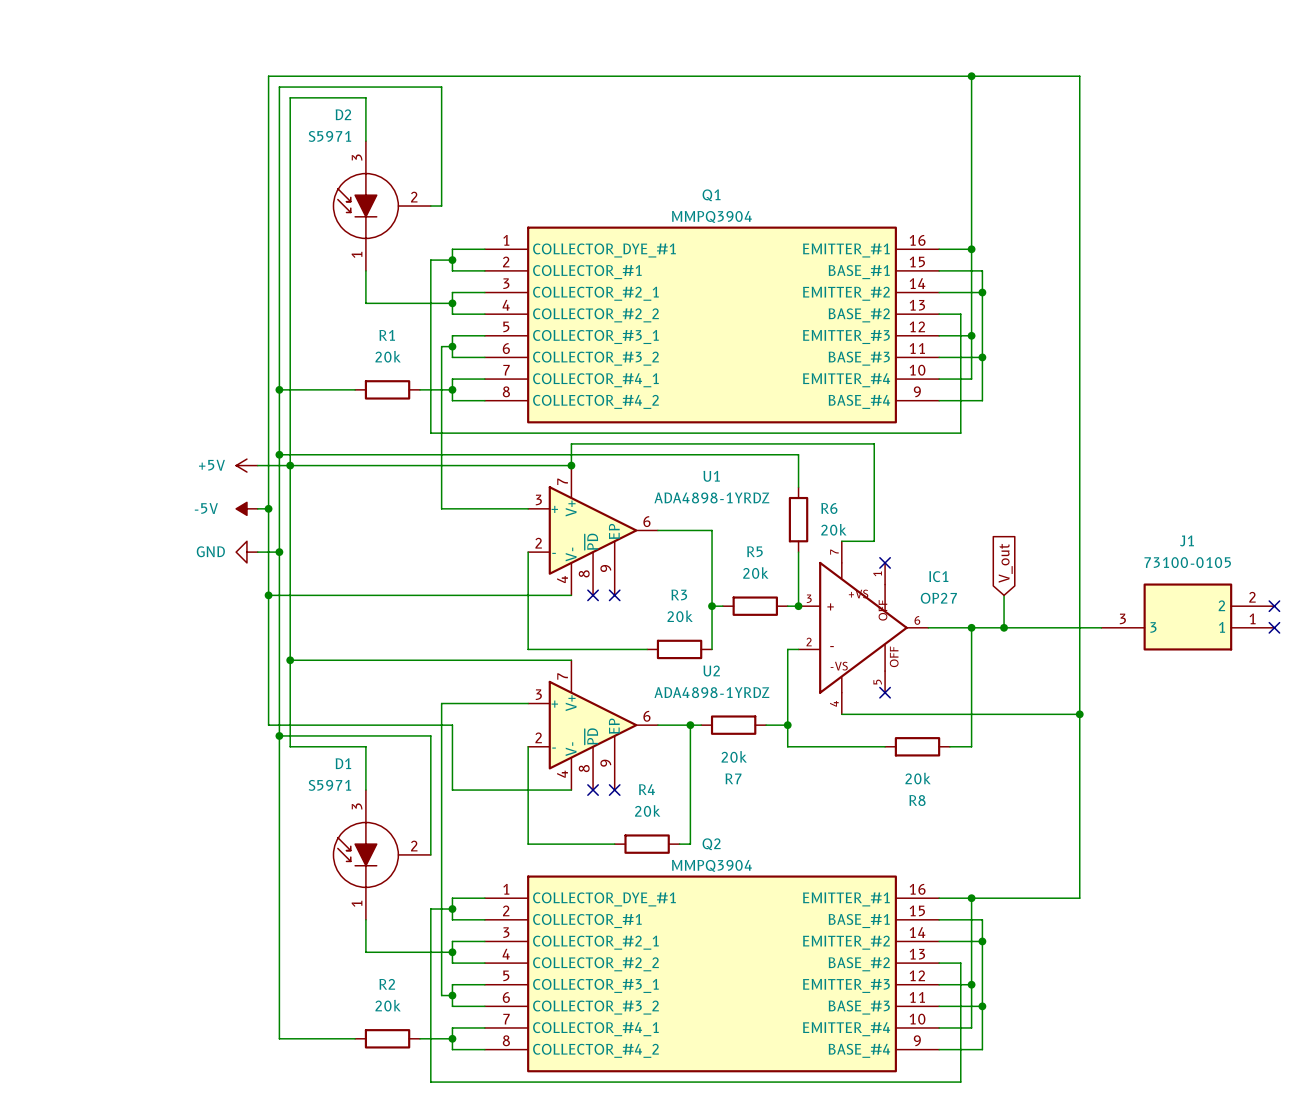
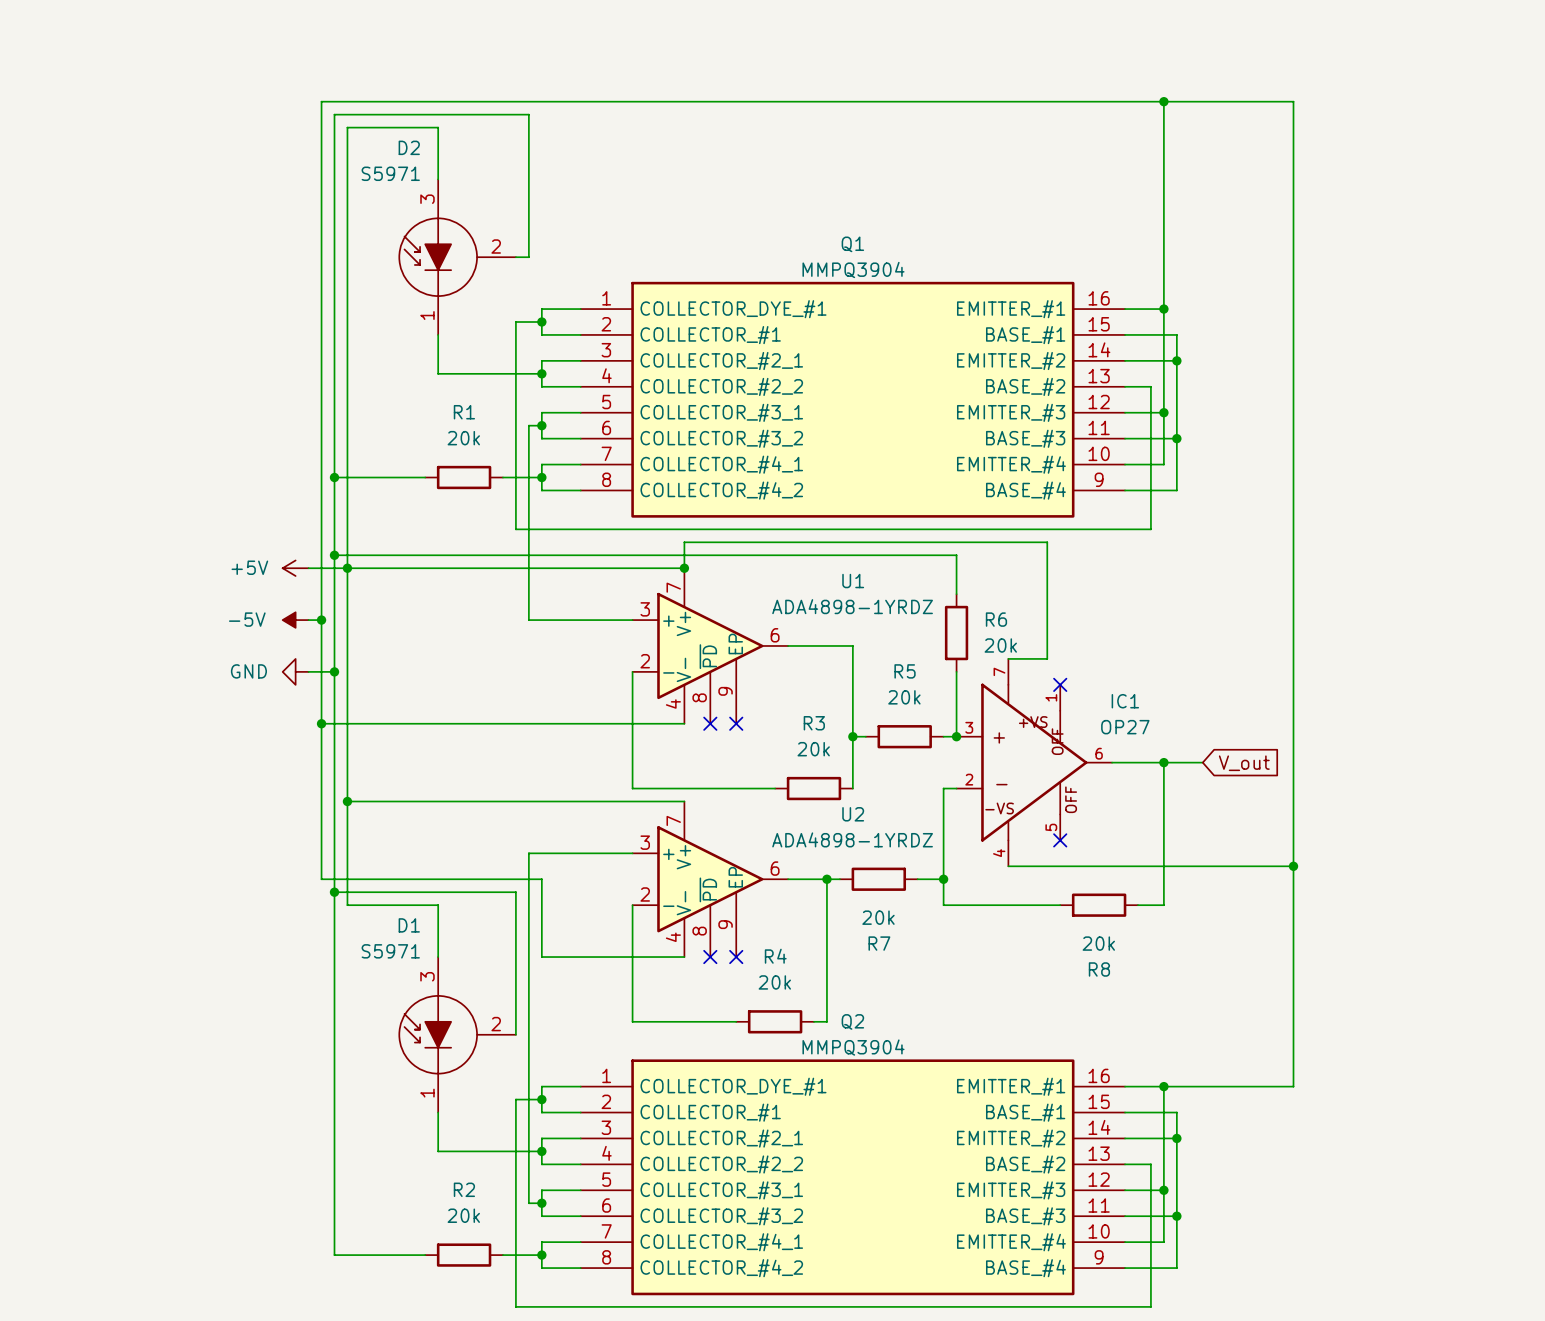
global label rotation: 0° (1005, 563) -> 90° clockwise (1244, 763)
global label position: V_out (1005, 563) -> V_out (1244, 763)
wire: (1004, 595) (1004, 627) (1101, 627) -> none
no-connect mark: (1274, 606) -> none
J1: 73100-0105 (1187, 616) -> none
junction: (1004, 627) -> none
no-connect mark: (1274, 627) -> none

